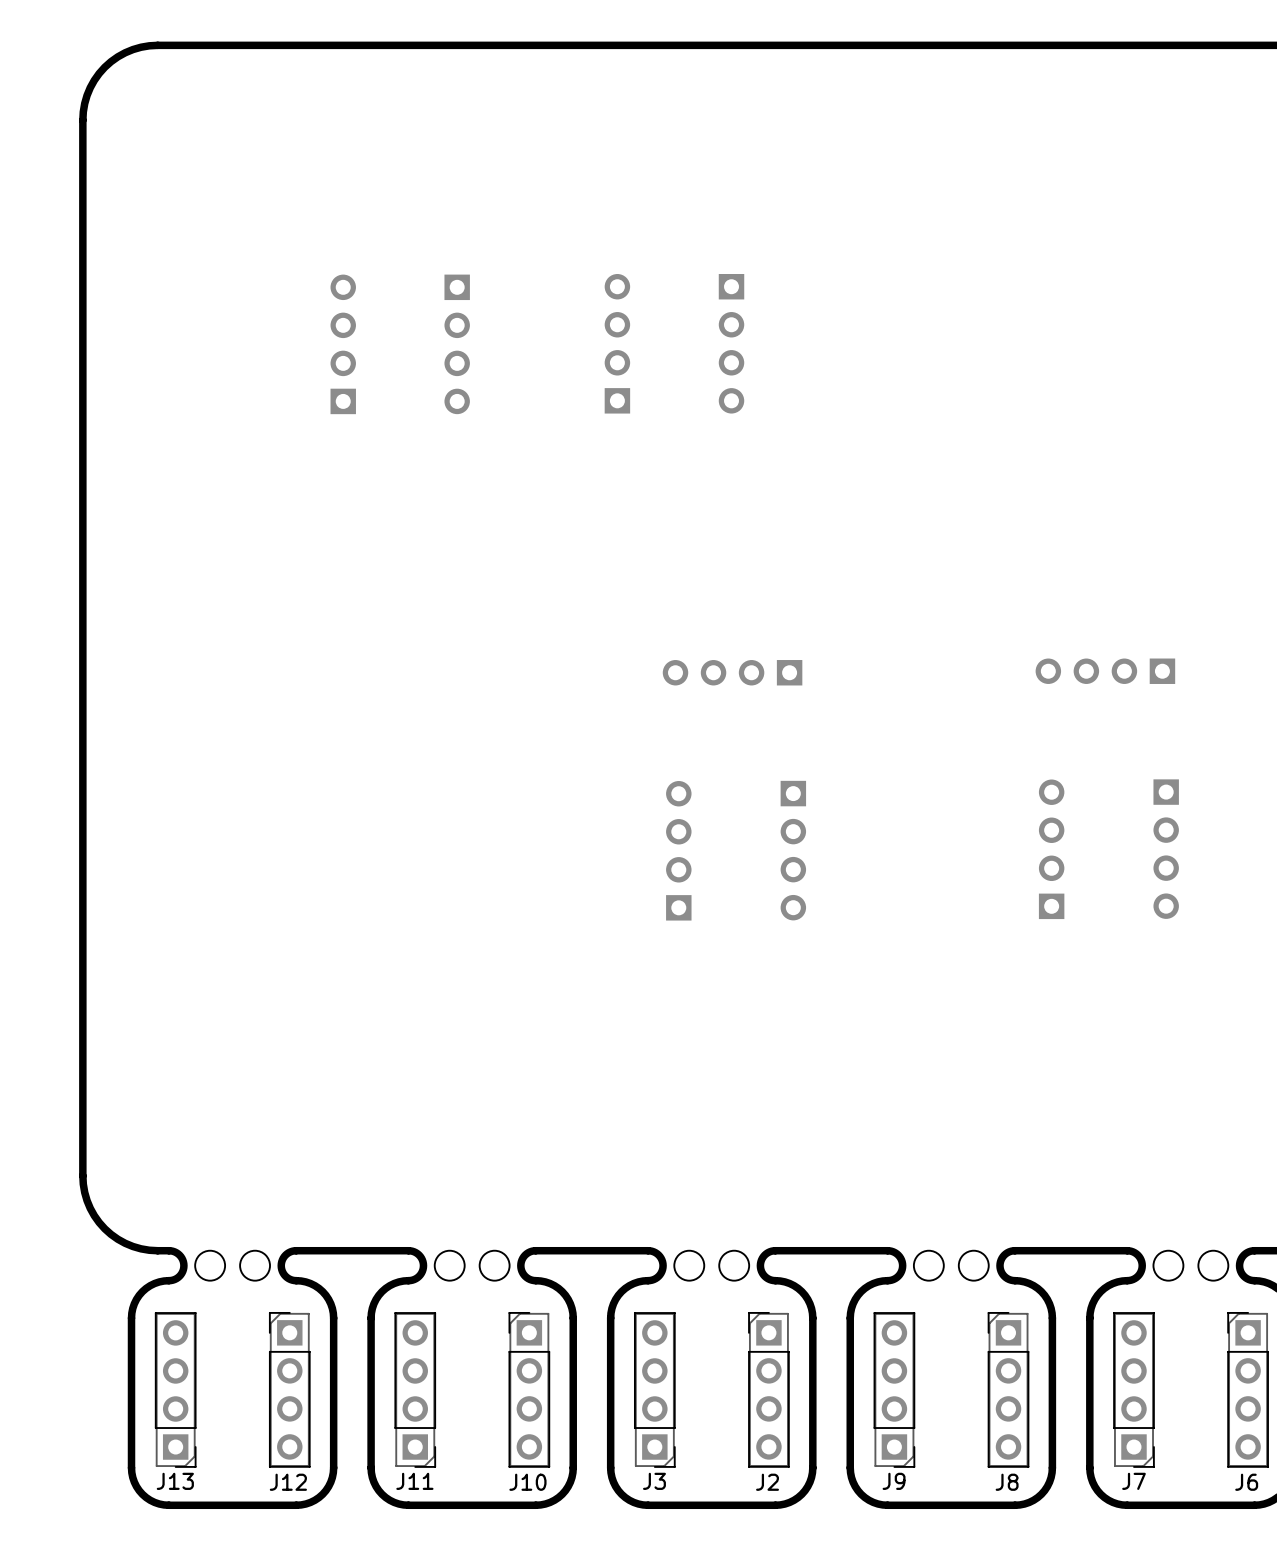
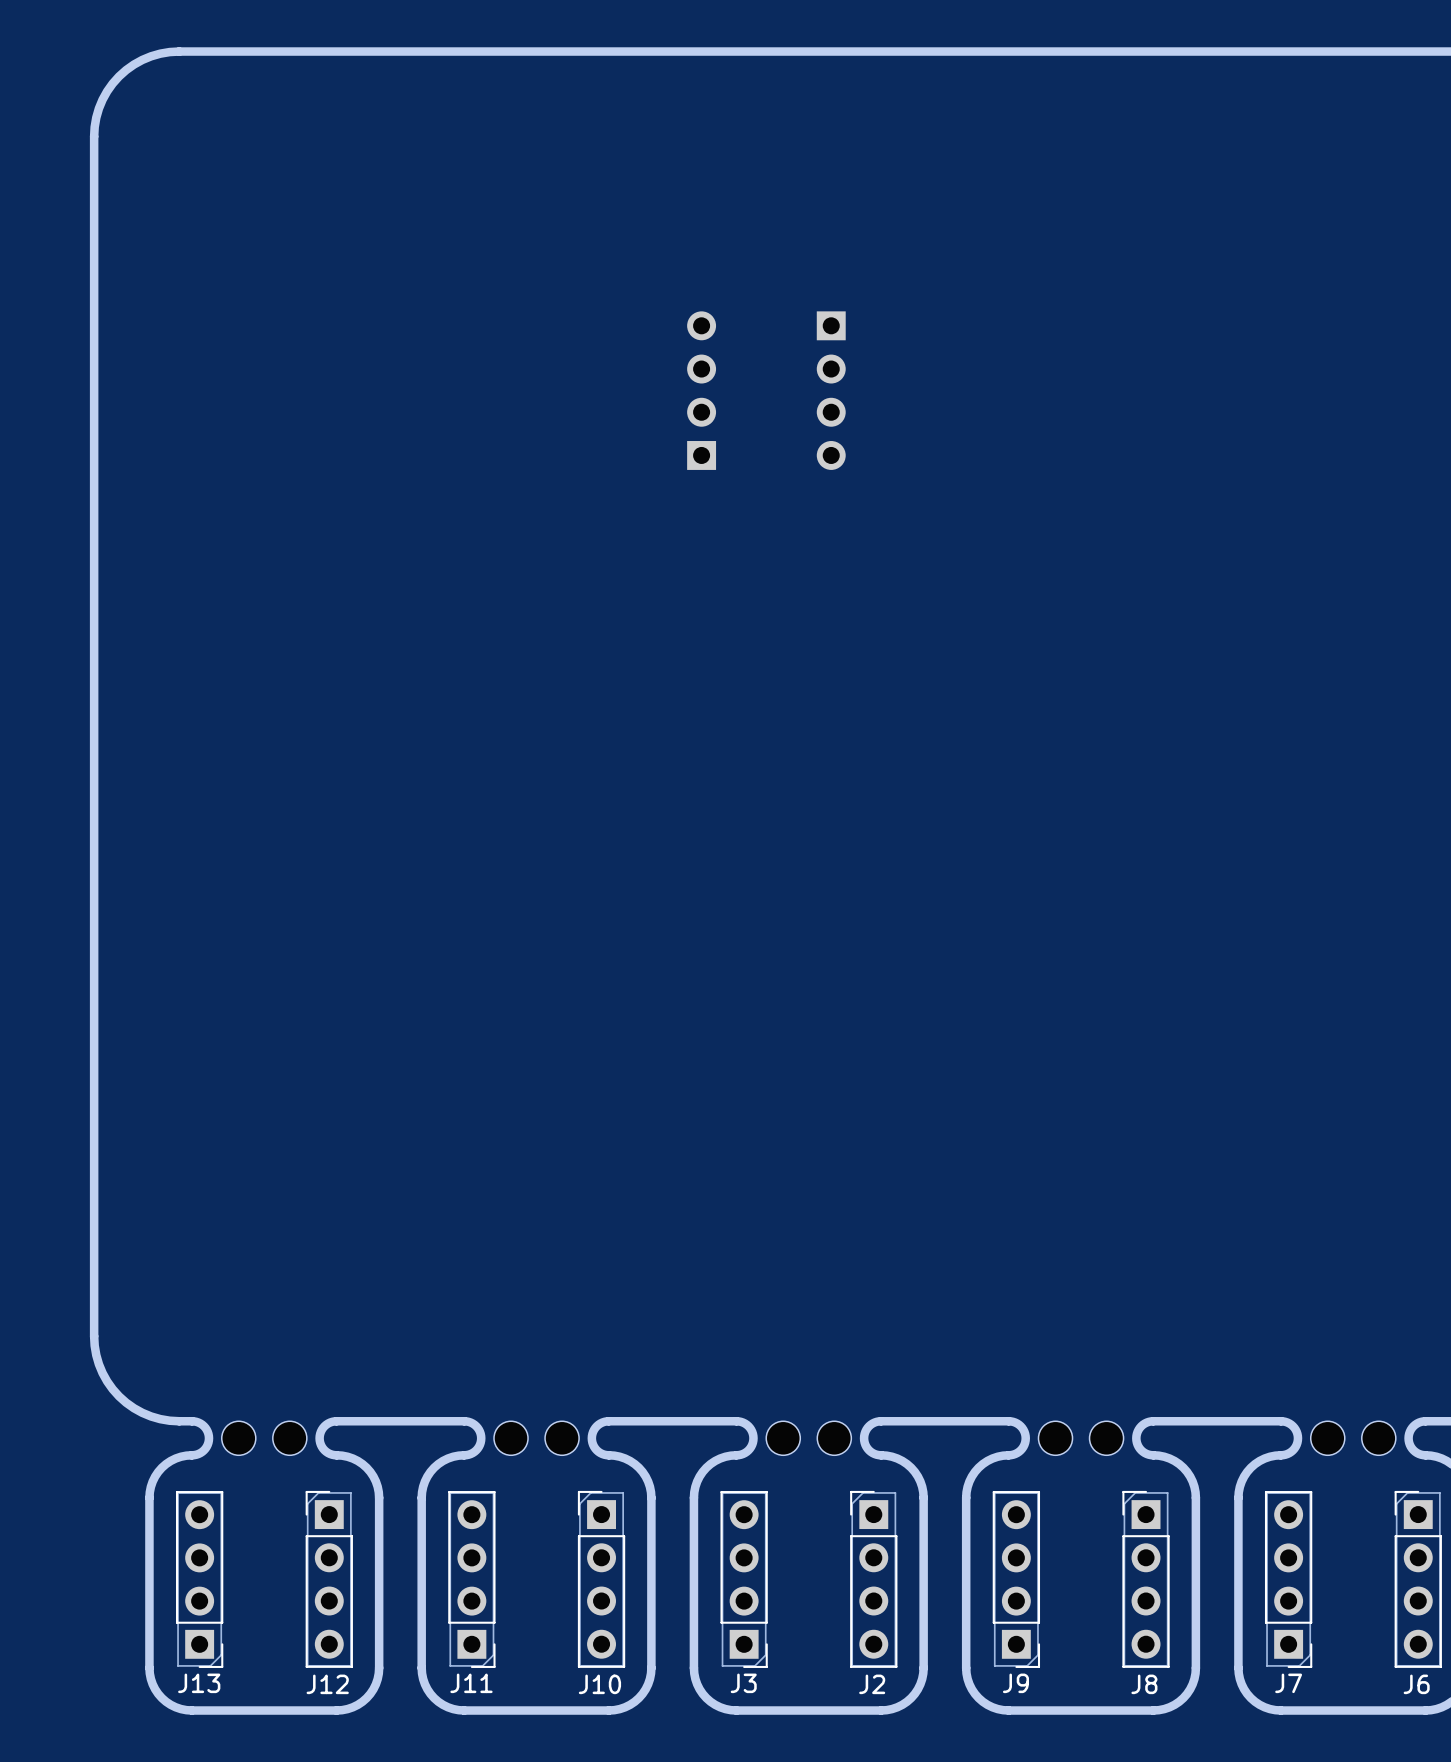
part: (343, 344) -> none
part: (457, 344) -> none
part: (1105, 671) -> none
part: (732, 672) -> none
part: (1051, 849) -> none
part: (1166, 849) -> none
part: (678, 850) -> none
part: (793, 850) -> none

